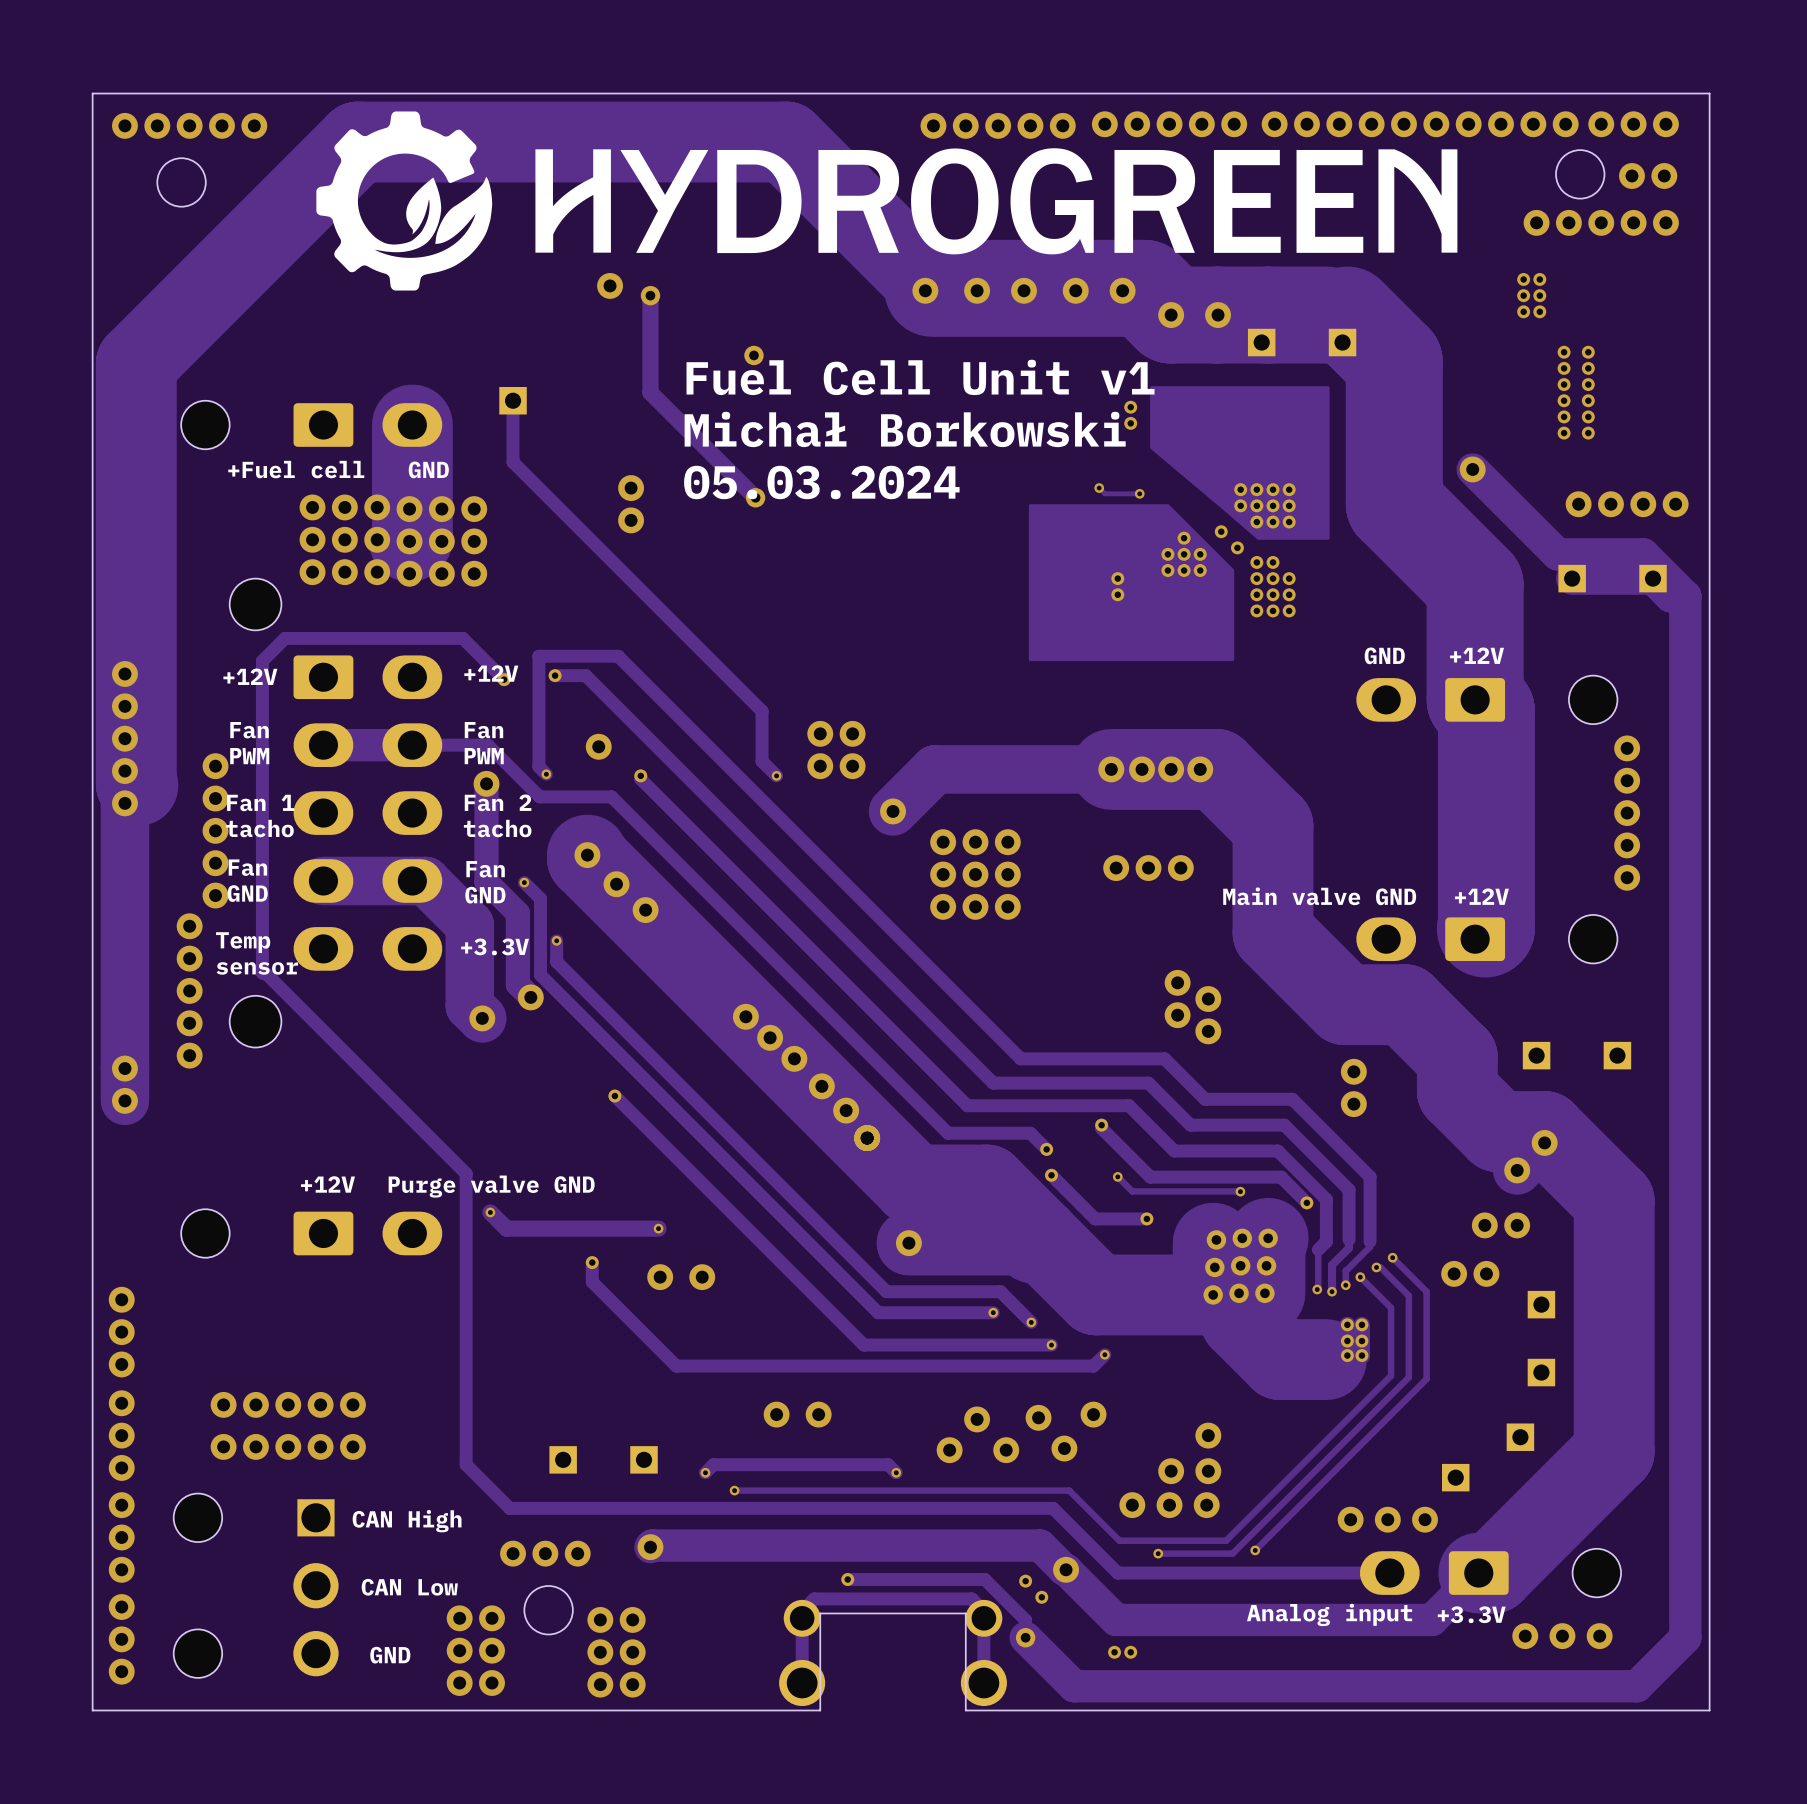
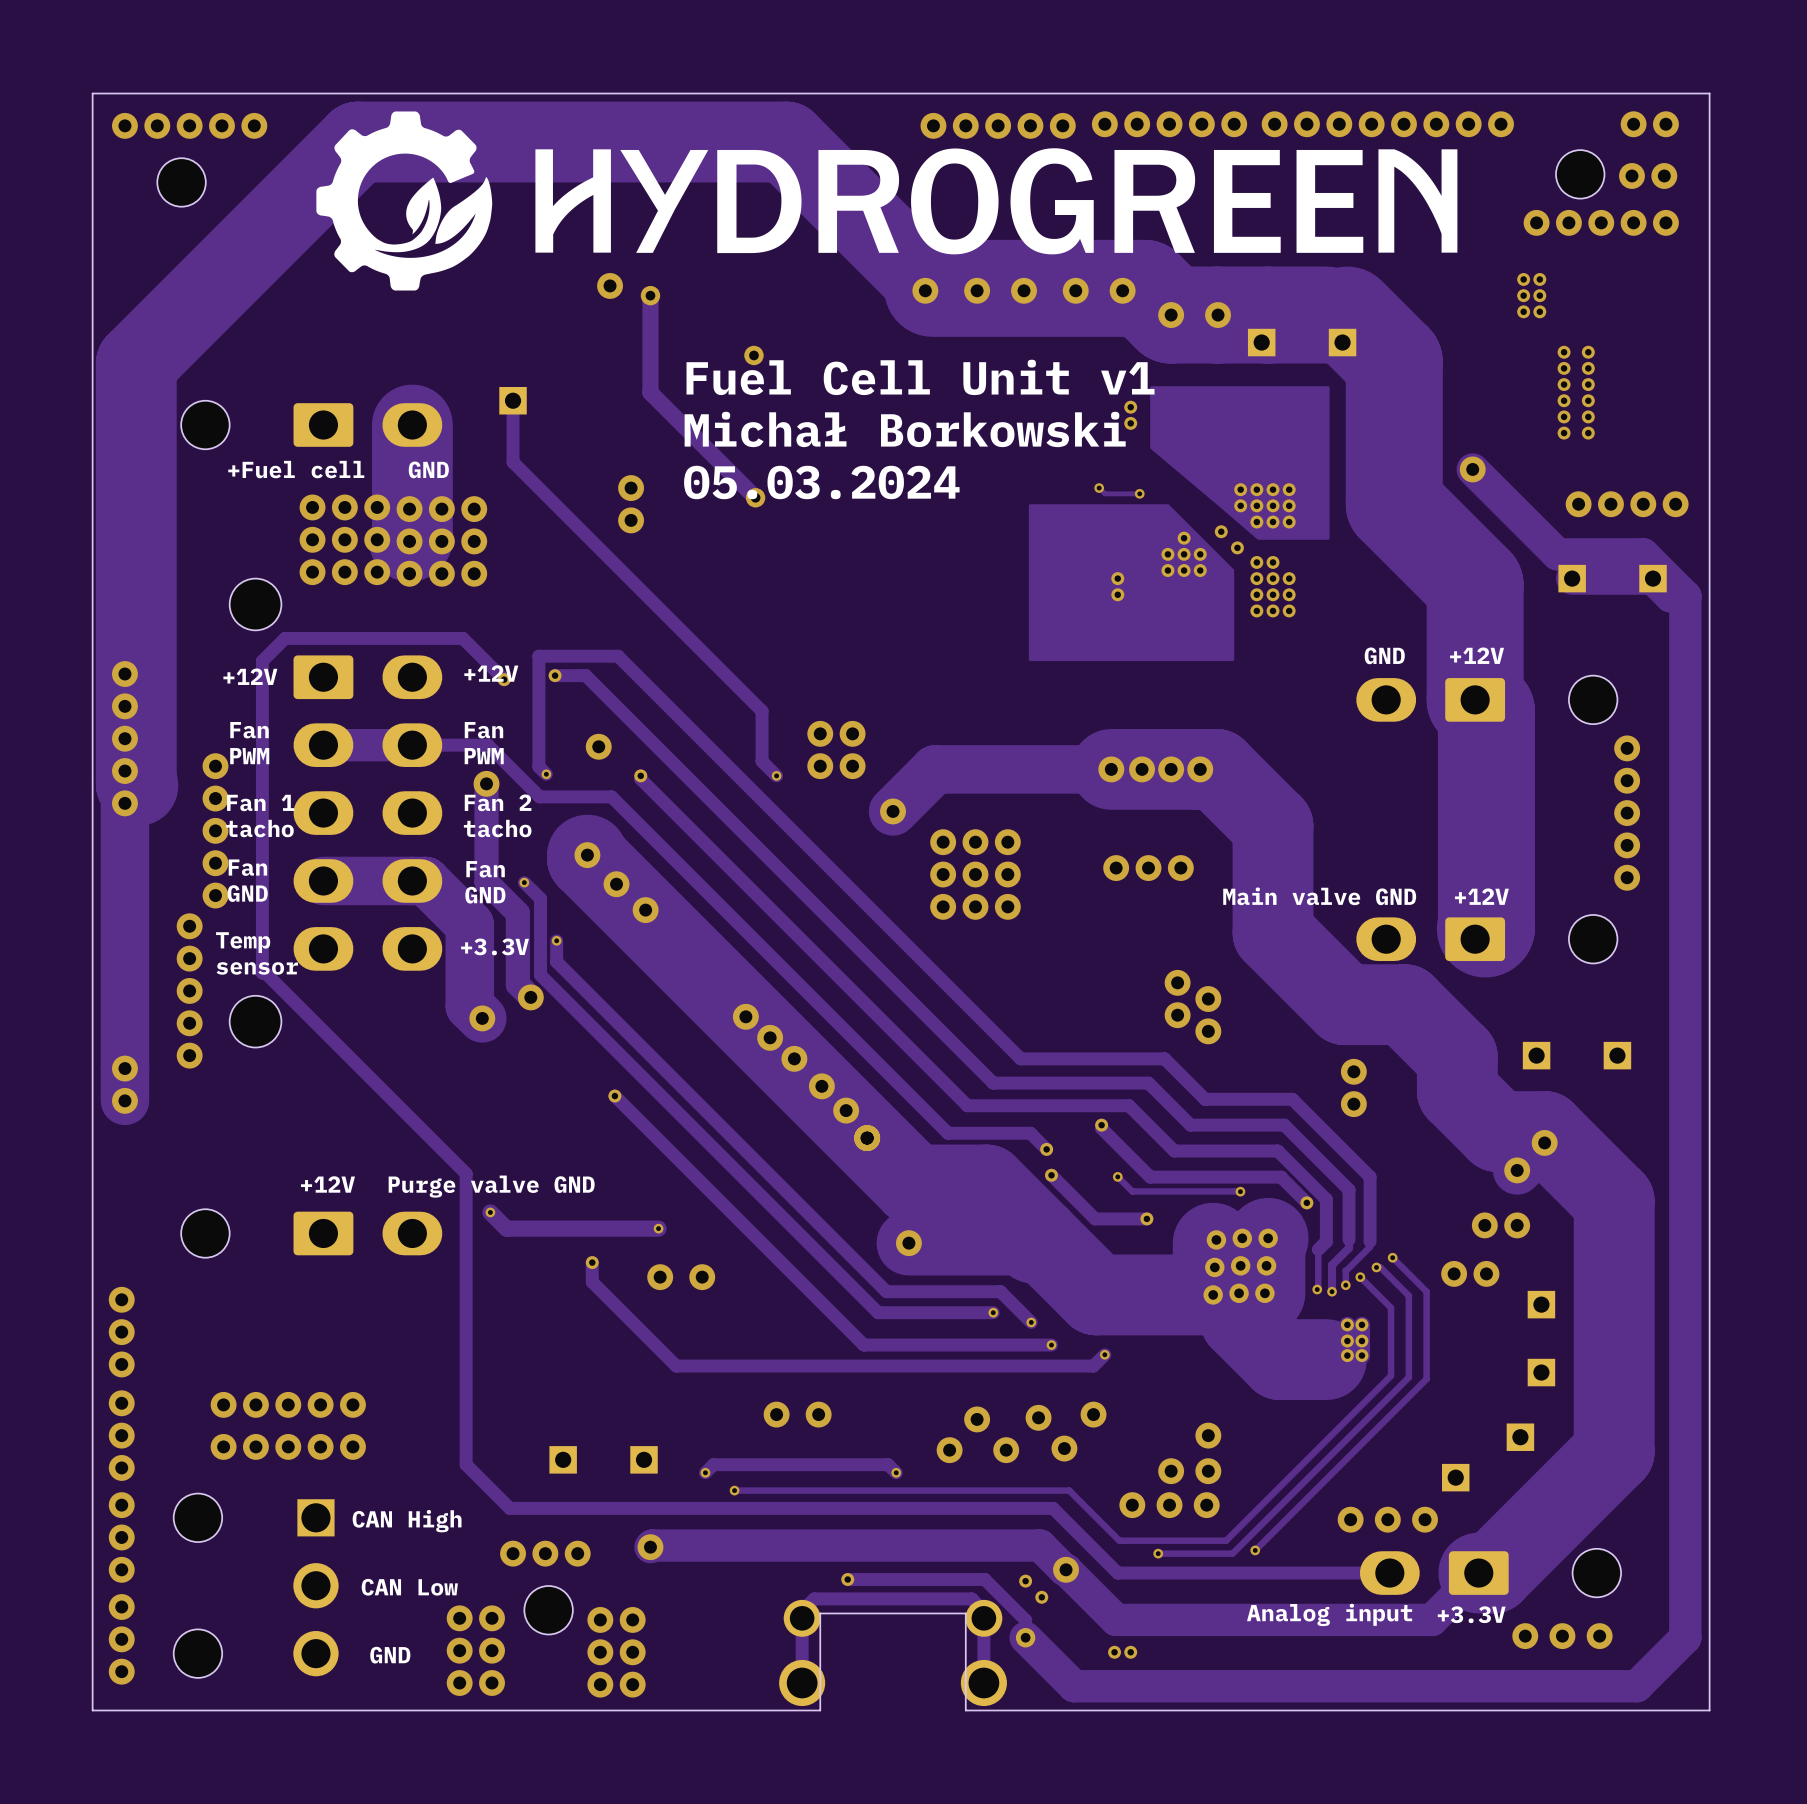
via: (1533, 124) -> none
via: (1565, 124) -> none
via: (1601, 124) -> none
round board edge: [1555, 149, 1605, 200] -> none
round board edge: [156, 157, 207, 208] -> none
part: none -> (1580, 174)
part: none -> (181, 182)
round board edge: [523, 1585, 574, 1635] -> none
part: none -> (548, 1610)

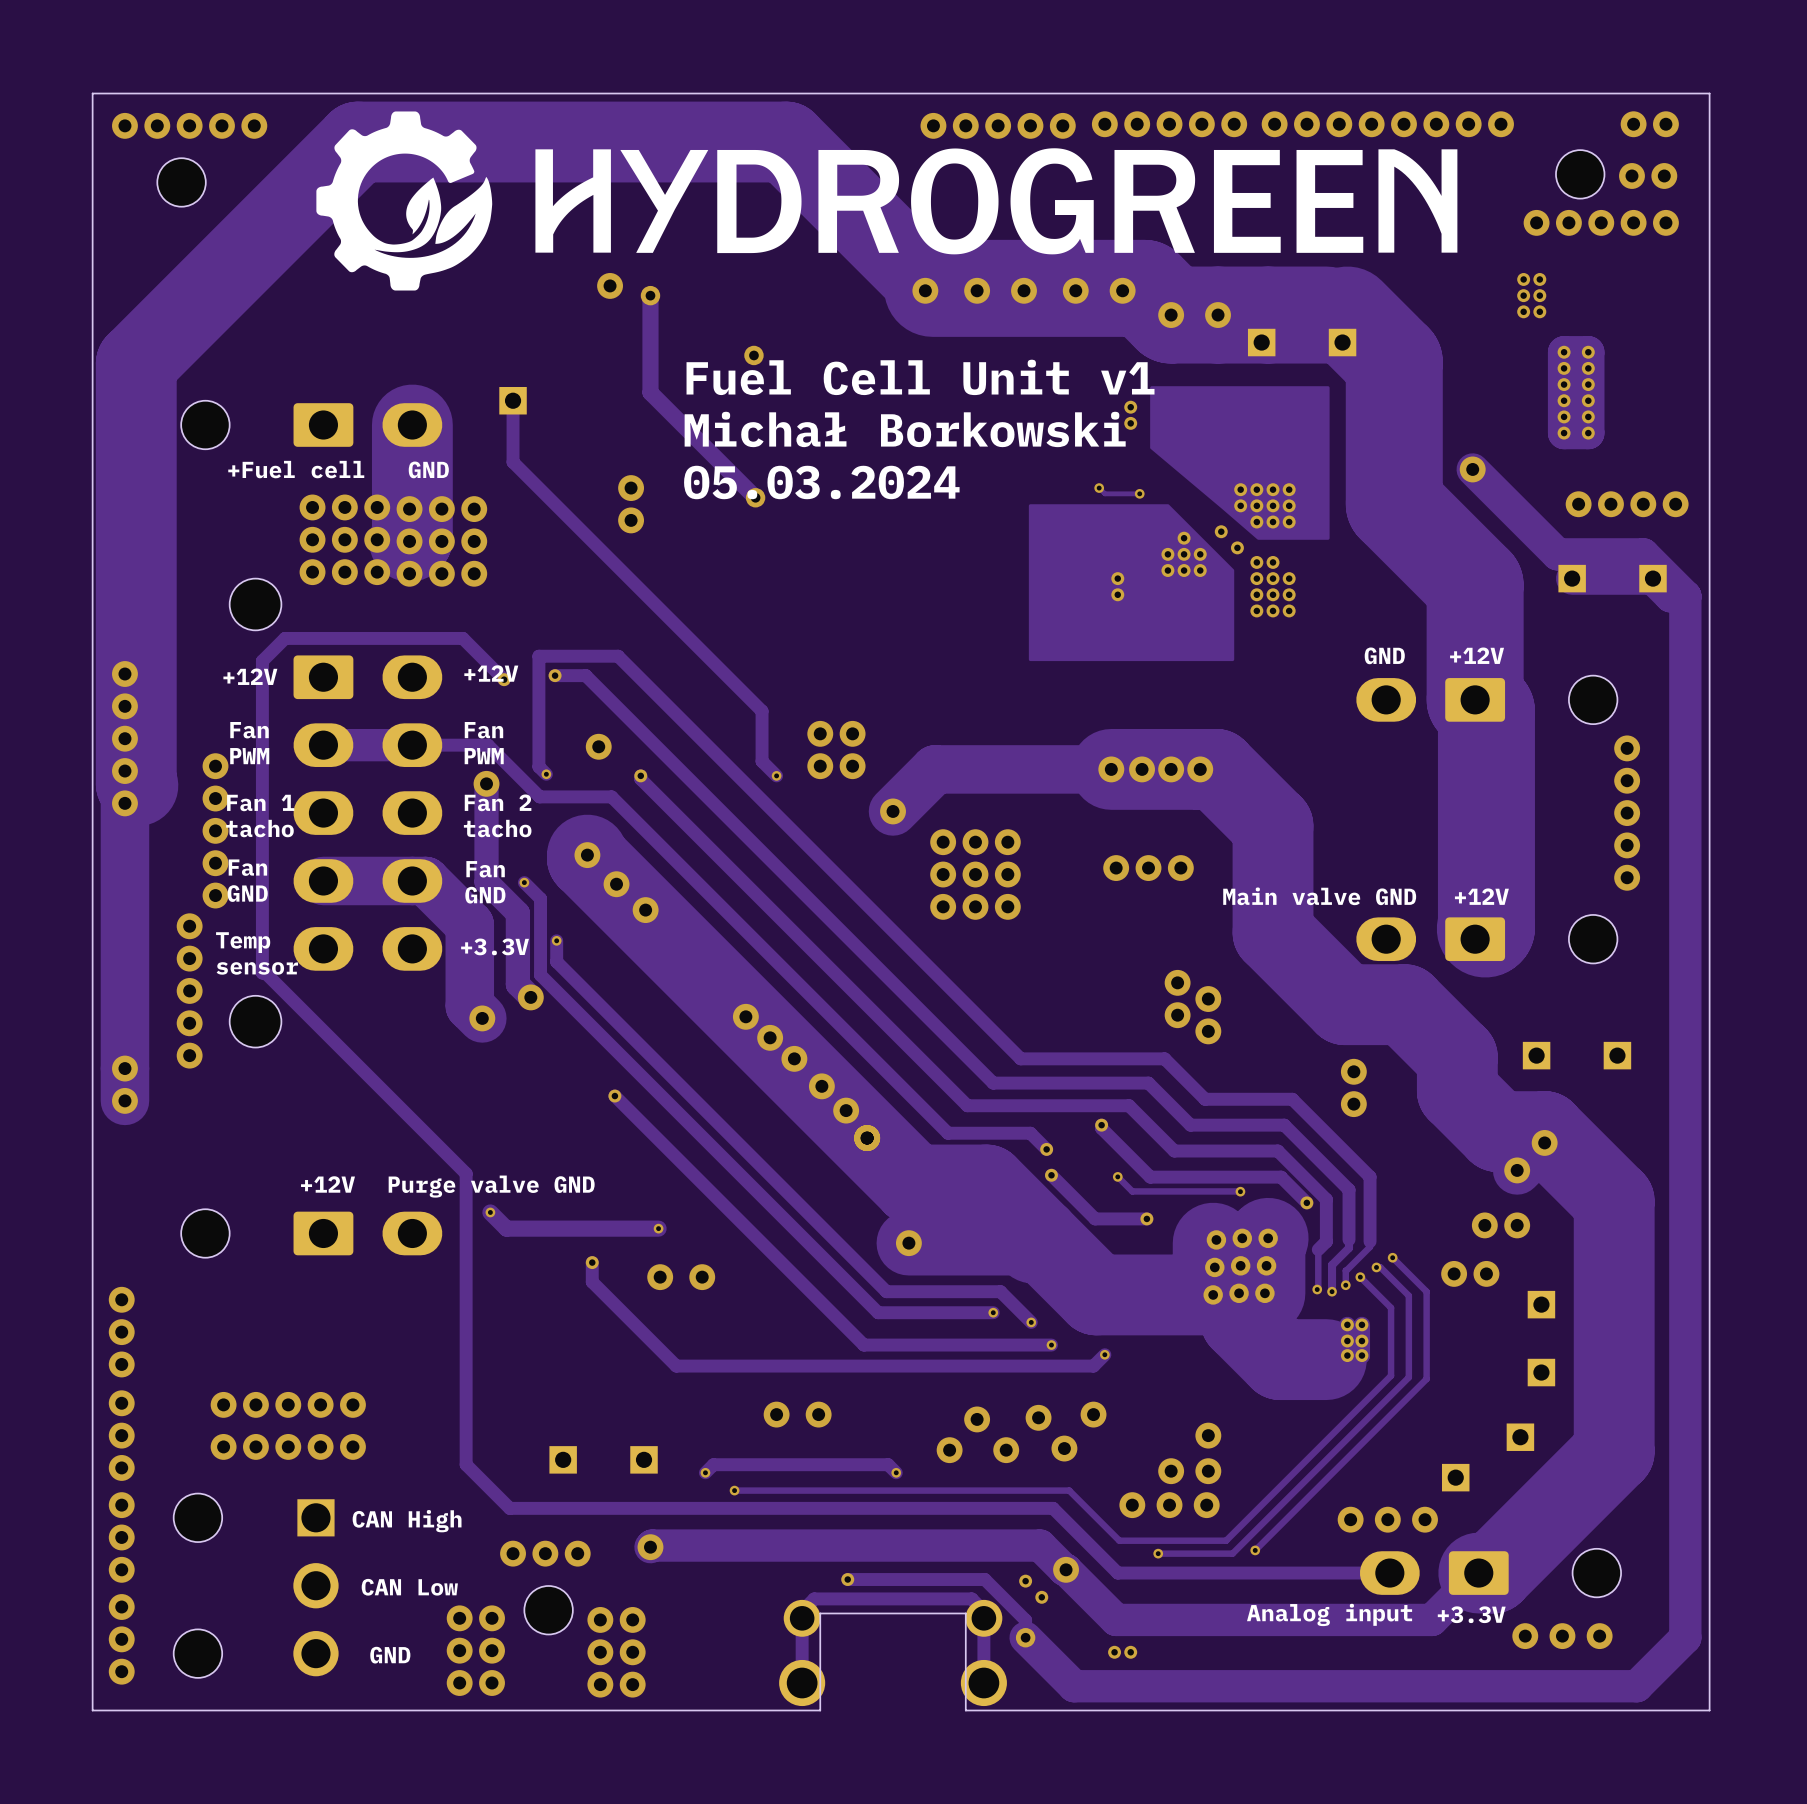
track: none -> (1588, 352) (1564, 352) (1564, 433) (1588, 433) (1588, 352)

